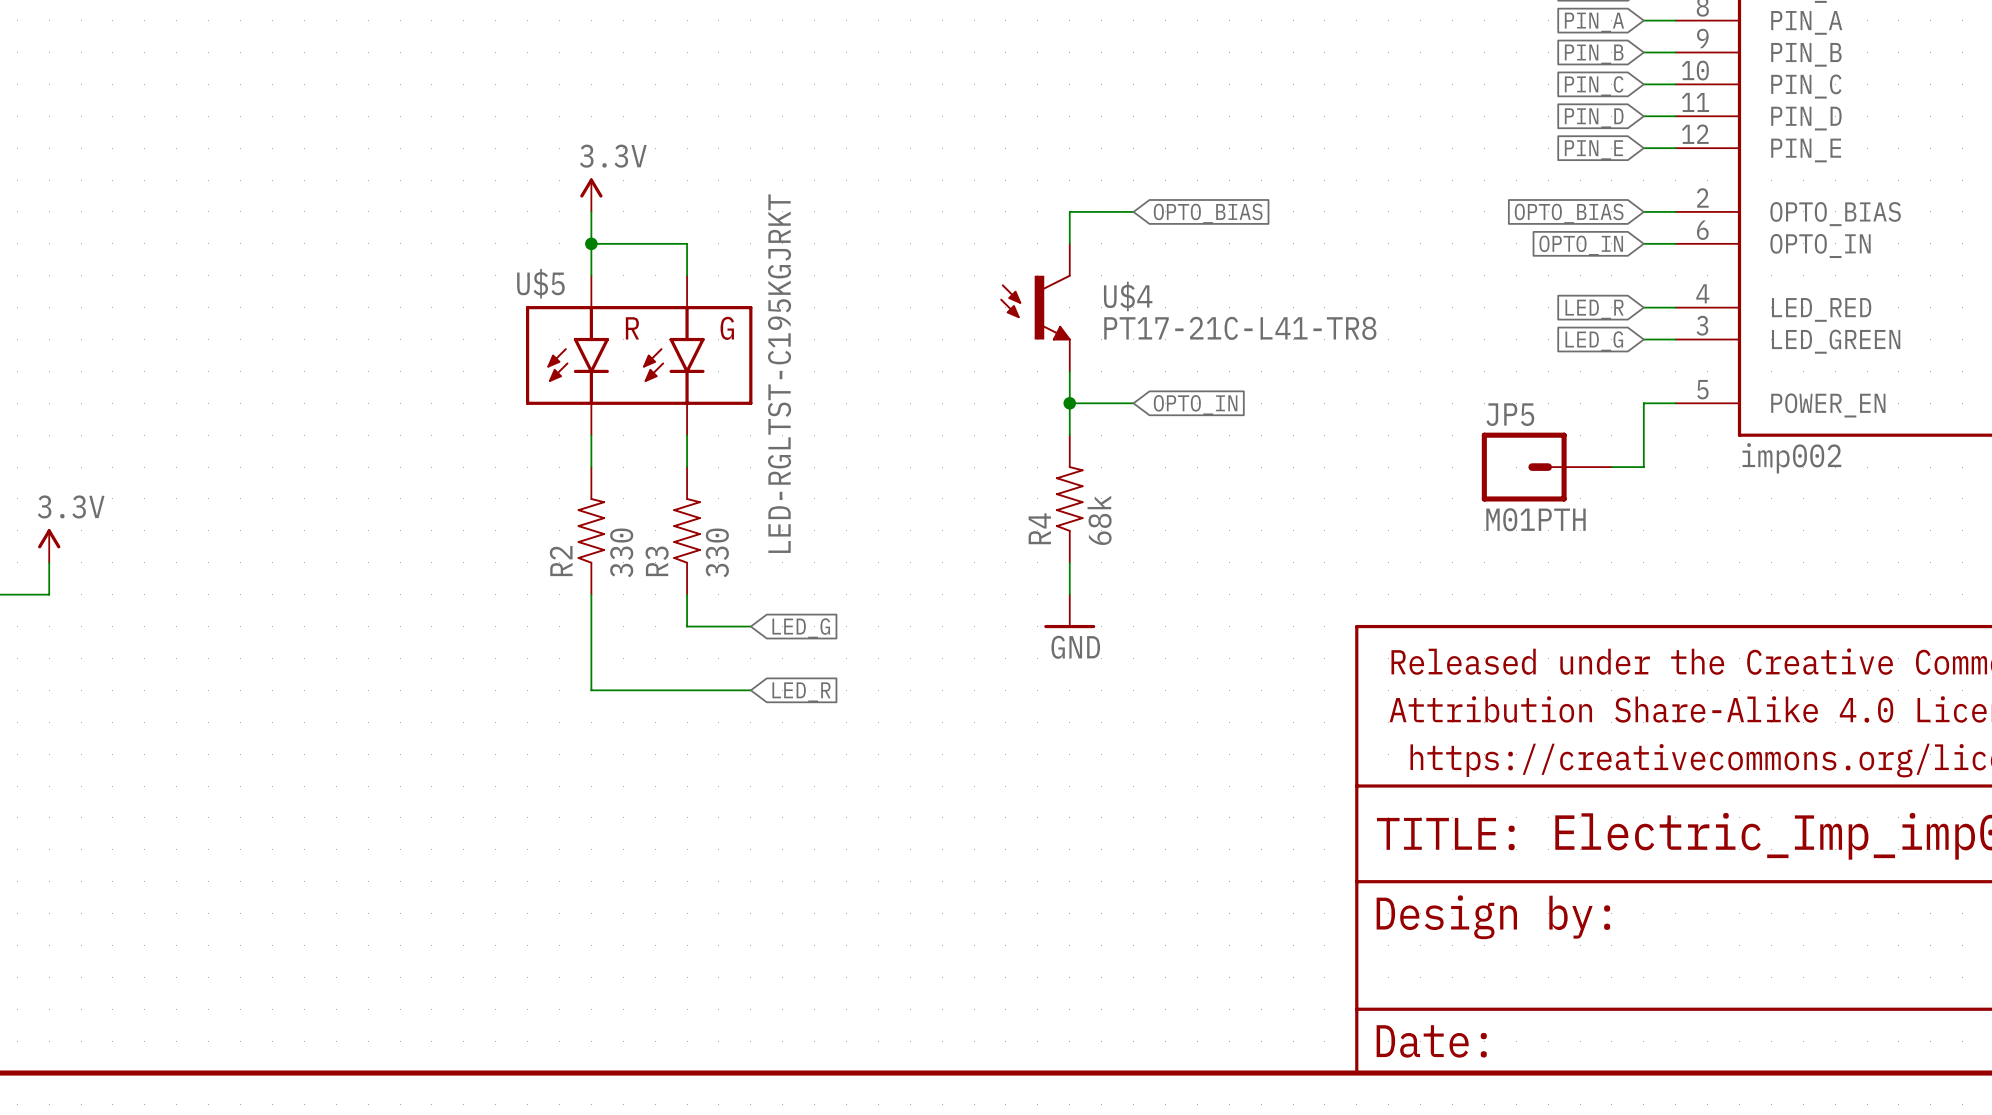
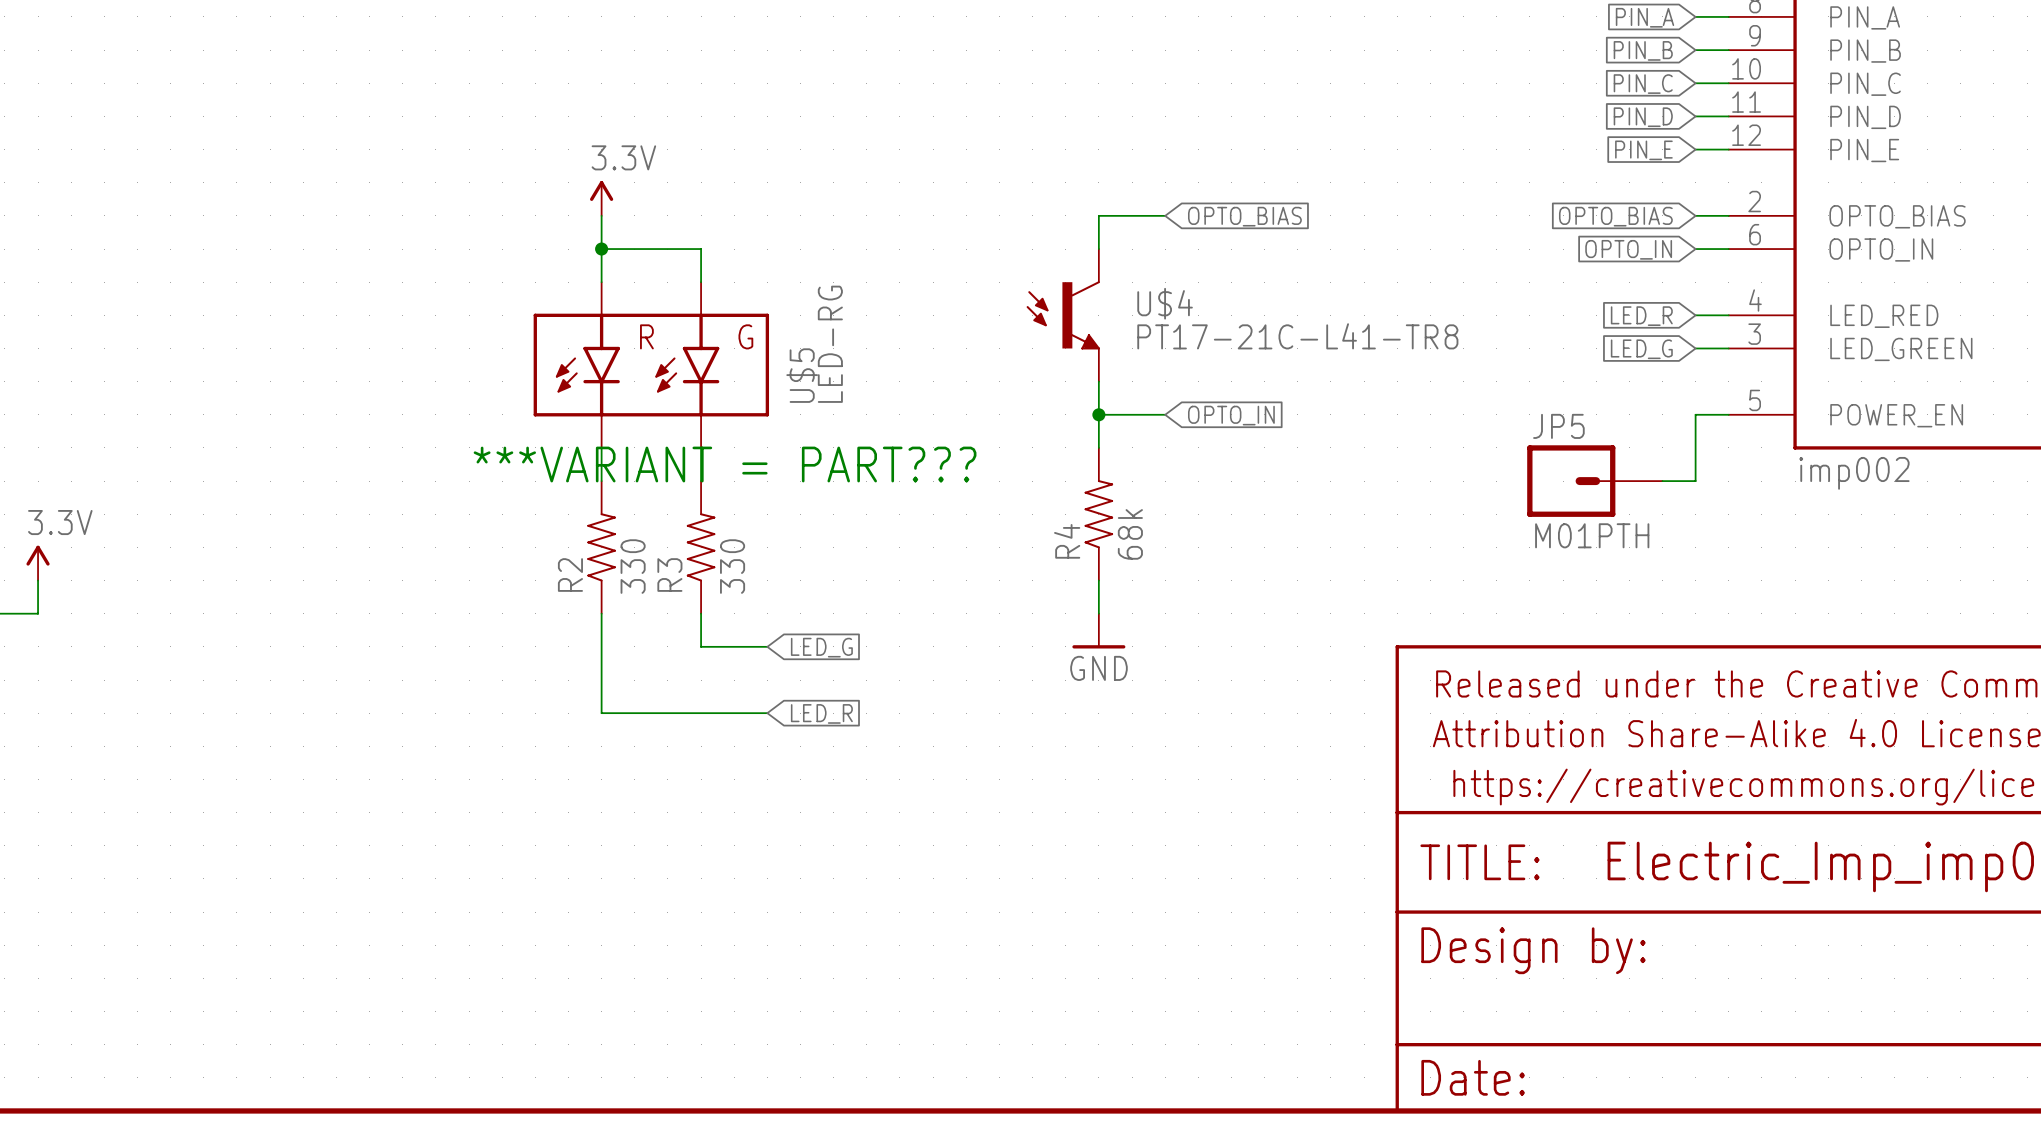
U$5 name rotation: 0° (540, 283) -> 90° counterclockwise (802, 375)
U$5 name position: U$5 (540, 283) -> U$5 (802, 375)
U$5 value: LED-RGLTST-C195KGJRKT (779, 373) -> LED-RG (830, 344)
text: none -> ***VARIANT = PART??? (725, 464)

